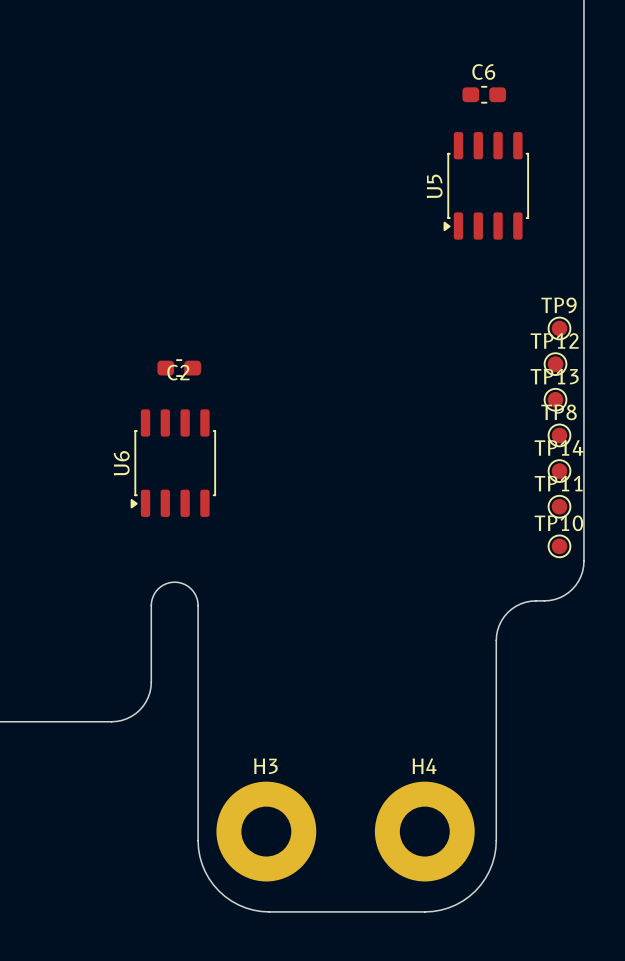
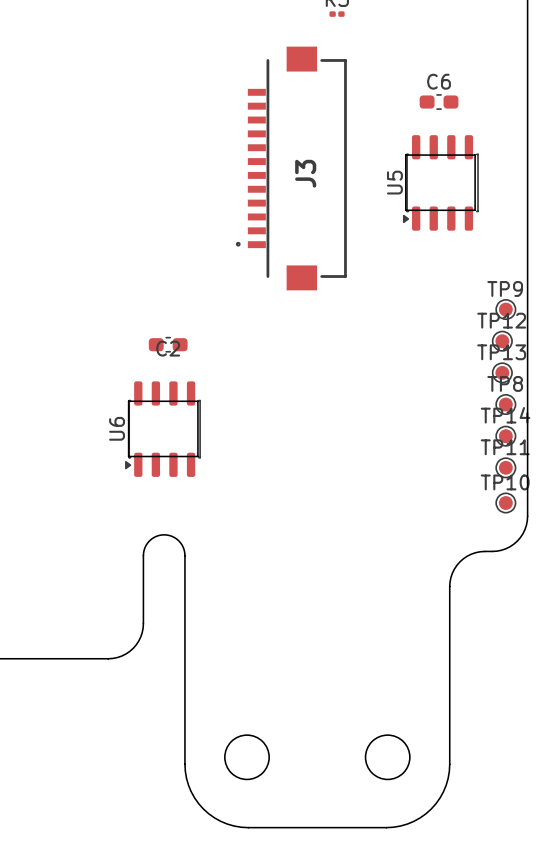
board edge: none -> (405, 155) (405, 210) (475, 210) (475, 155) (405, 155)
J3: none -> (291, 168)
board edge: none -> (128, 401) (128, 456) (197, 456) (197, 401) (128, 401)
round board edge: none -> [224, 734, 270, 781]
round board edge: none -> [364, 734, 411, 781]
H3: (266, 831) -> none
H4: (424, 831) -> none

